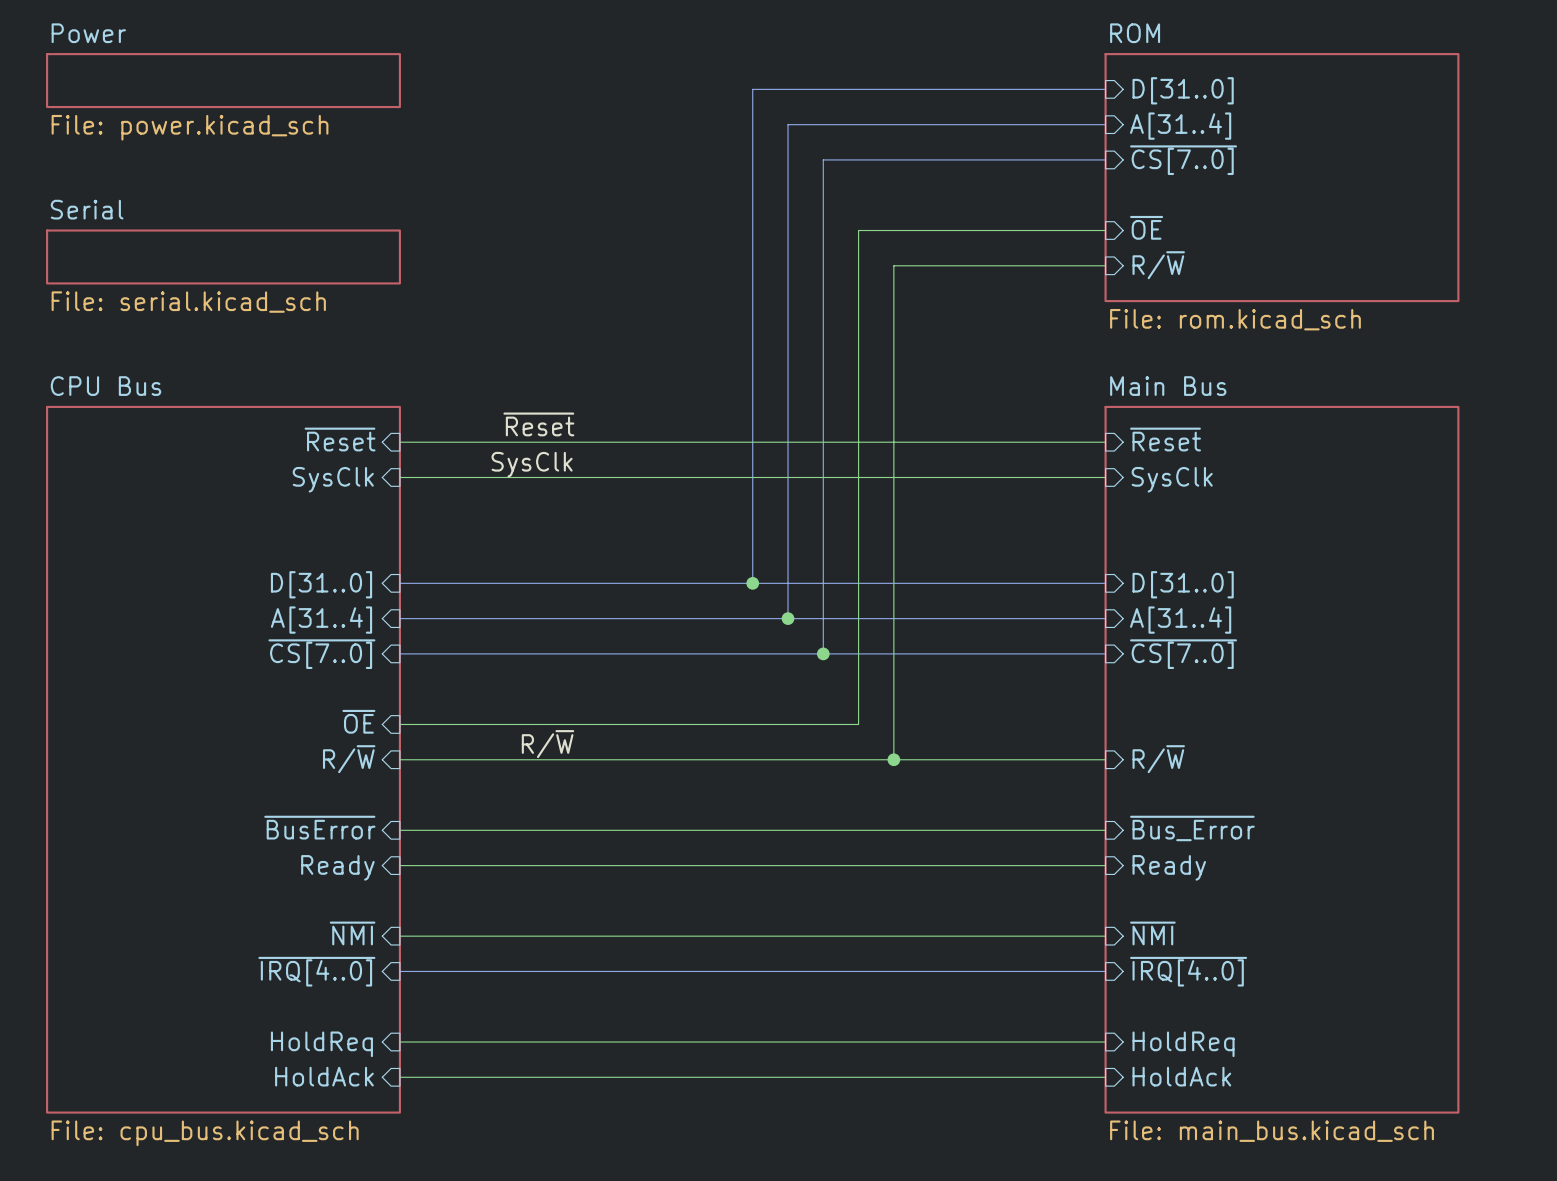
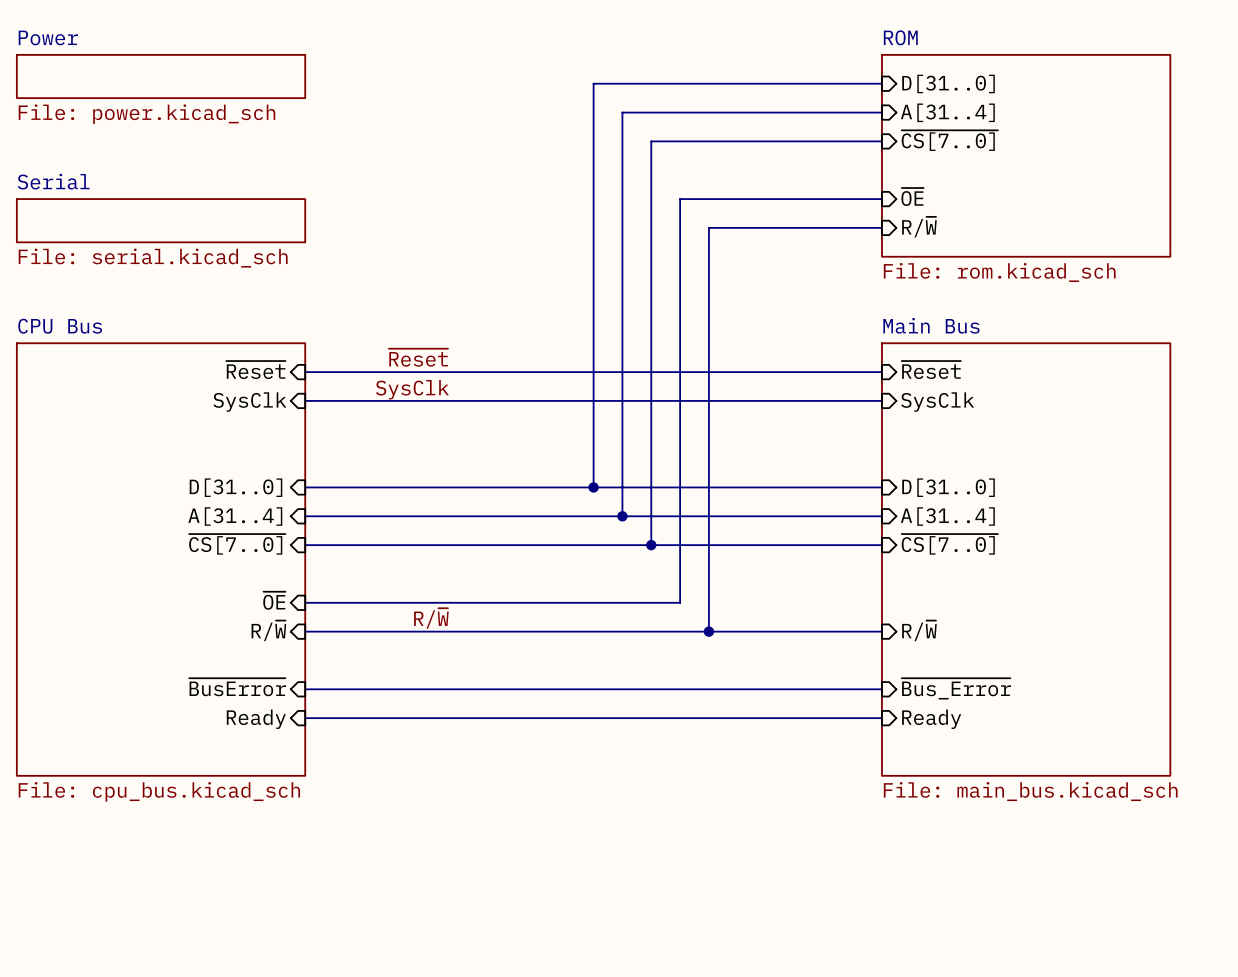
sheet CPU Bus: none -> File: cpu_bus.kicad_sch (161, 559)
sheet Main Bus: none -> File: main_bus.kicad_sch (1026, 559)
sheet CPU Bus: File: cpu_bus.kicad_sch (223, 759) -> none
sheet Main Bus: File: main_bus.kicad_sch (1281, 759) -> none
sheet pin: ~{NMI} (352, 933) -> none
sheet pin: ~{NMI} (1152, 933) -> none
wire: (399, 936) (1105, 936) -> none
sheet pin: ~{IRQ[4..0]} (316, 971) -> none
bus: (399, 971) (1105, 971) -> none
sheet pin: ~{IRQ[4..0]} (1188, 971) -> none
wire: (399, 1042) (1105, 1042) -> none
sheet pin: HoldReq (321, 1044) -> none
sheet pin: HoldReq (1183, 1044) -> none
sheet pin: HoldAck (324, 1076) -> none
sheet pin: HoldAck (1181, 1076) -> none
wire: (399, 1077) (1105, 1077) -> none

